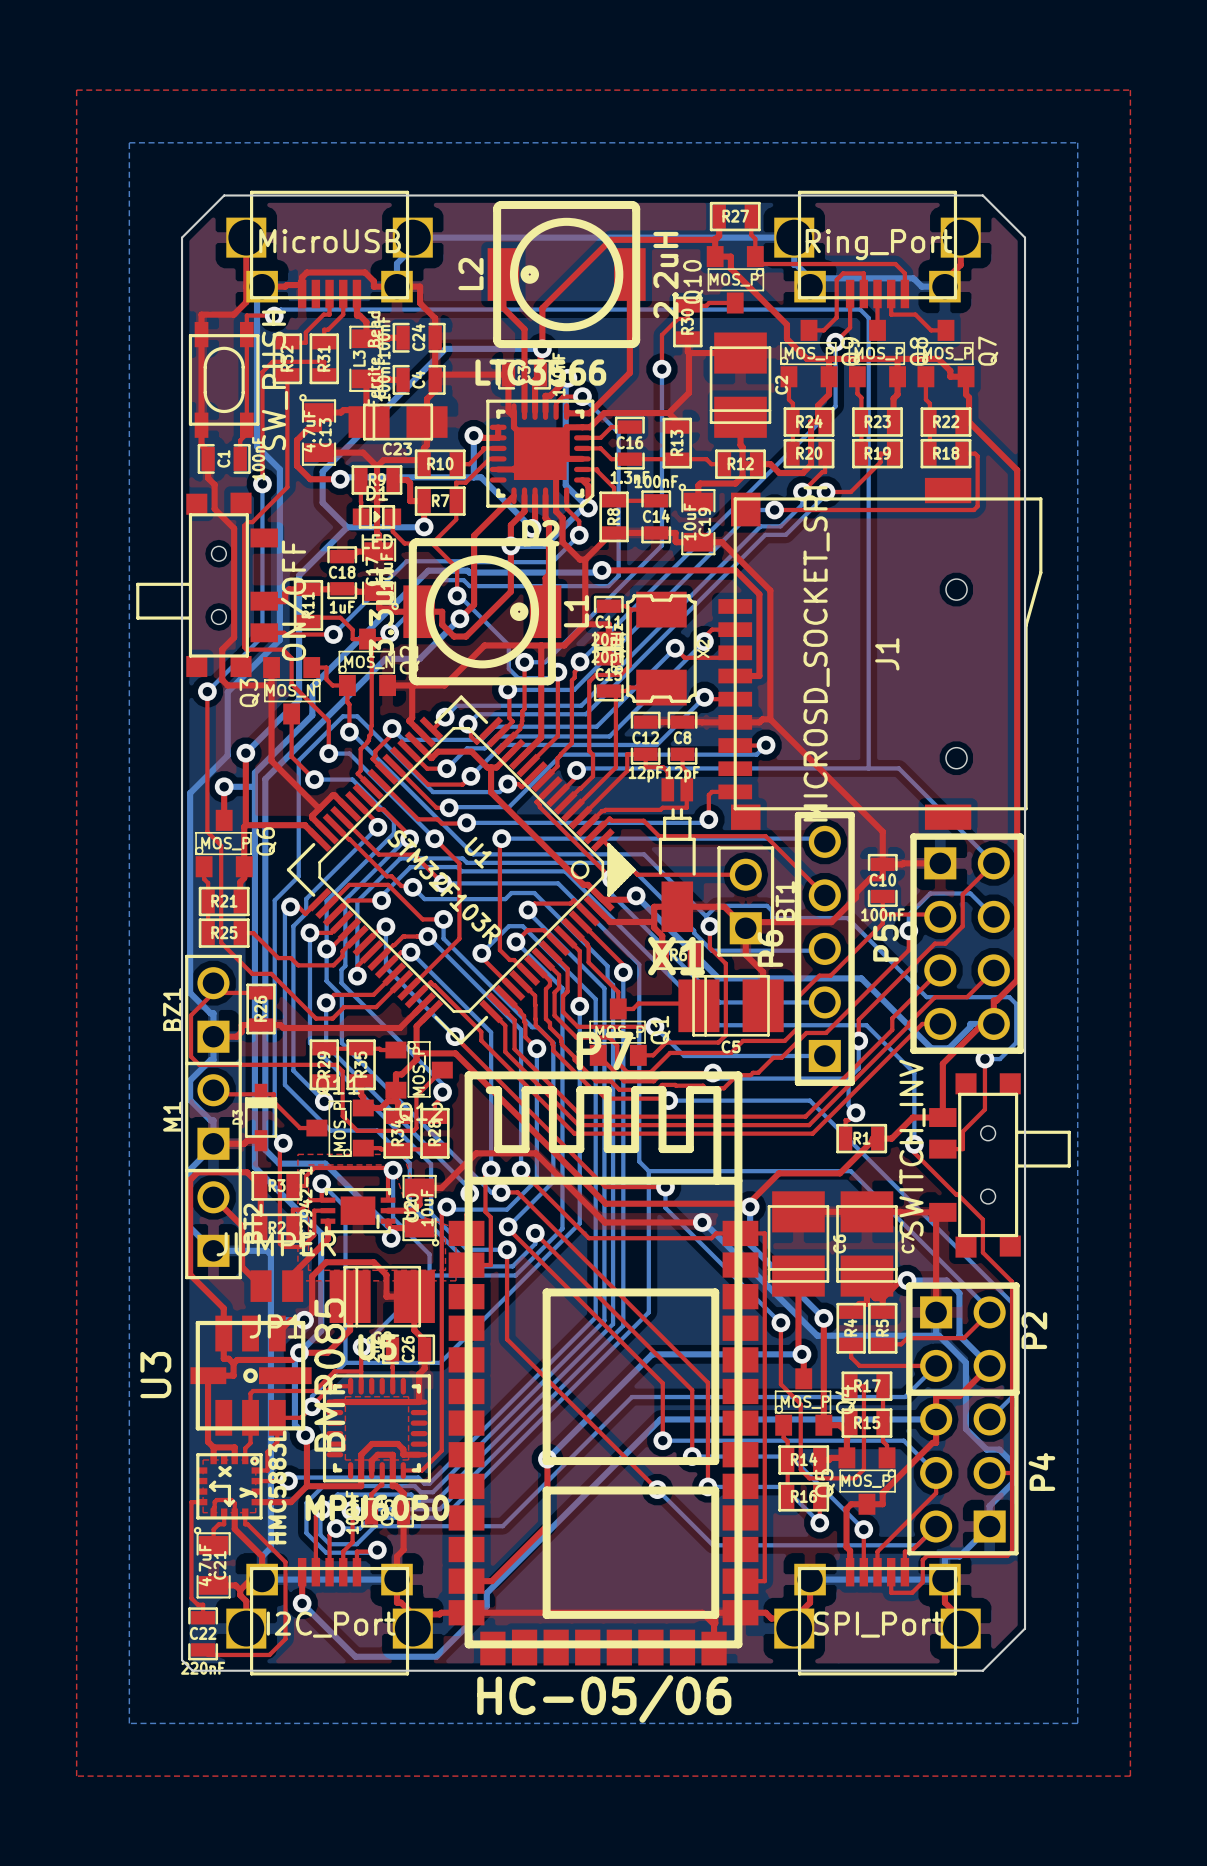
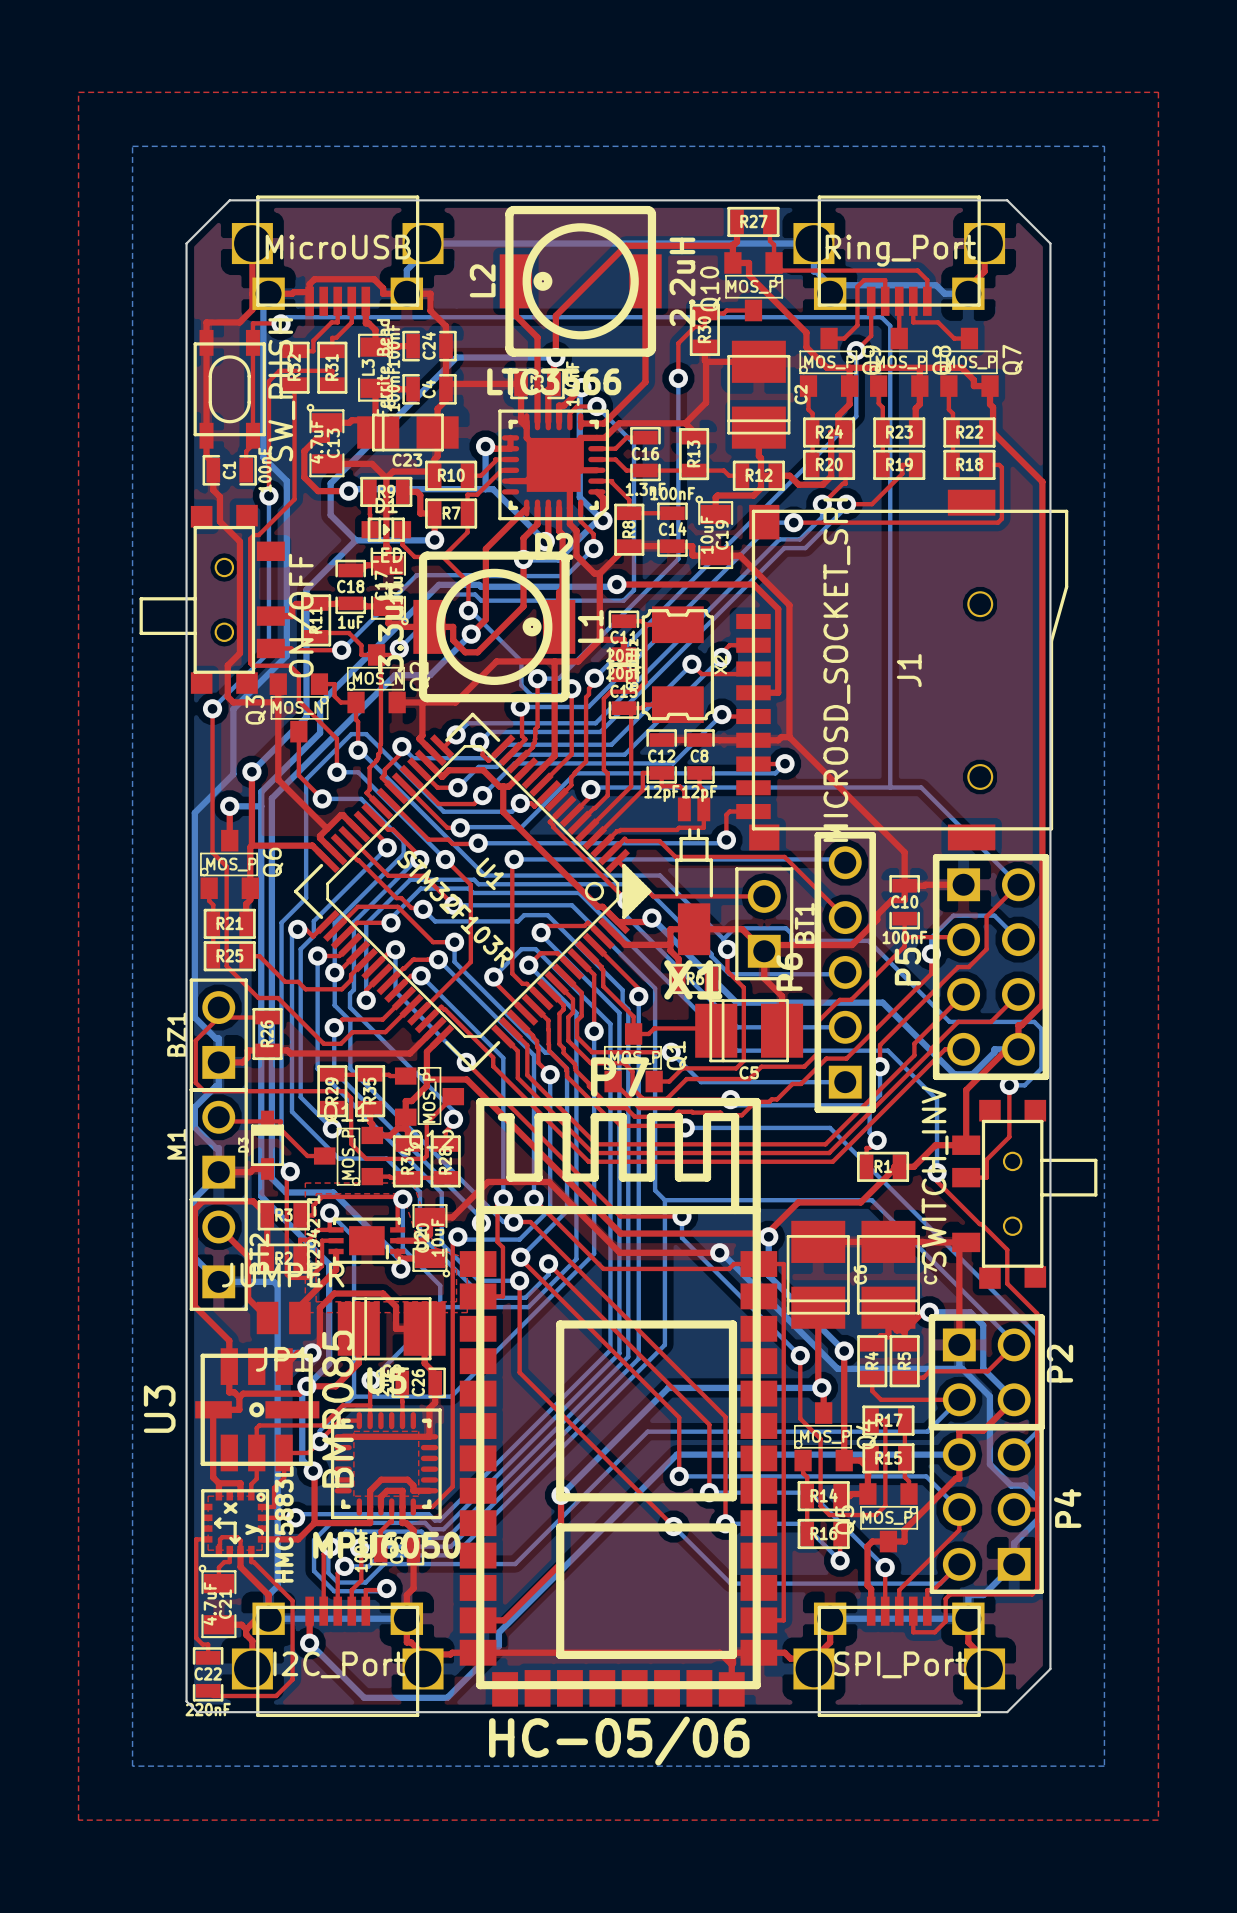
J1 footprint: [718, 477, 1043, 830] -> [736, 489, 1069, 851]
part footprint: [136, 492, 278, 678] -> [139, 504, 285, 694]
part footprint: [929, 1073, 1071, 1258] -> [952, 1099, 1098, 1289]

